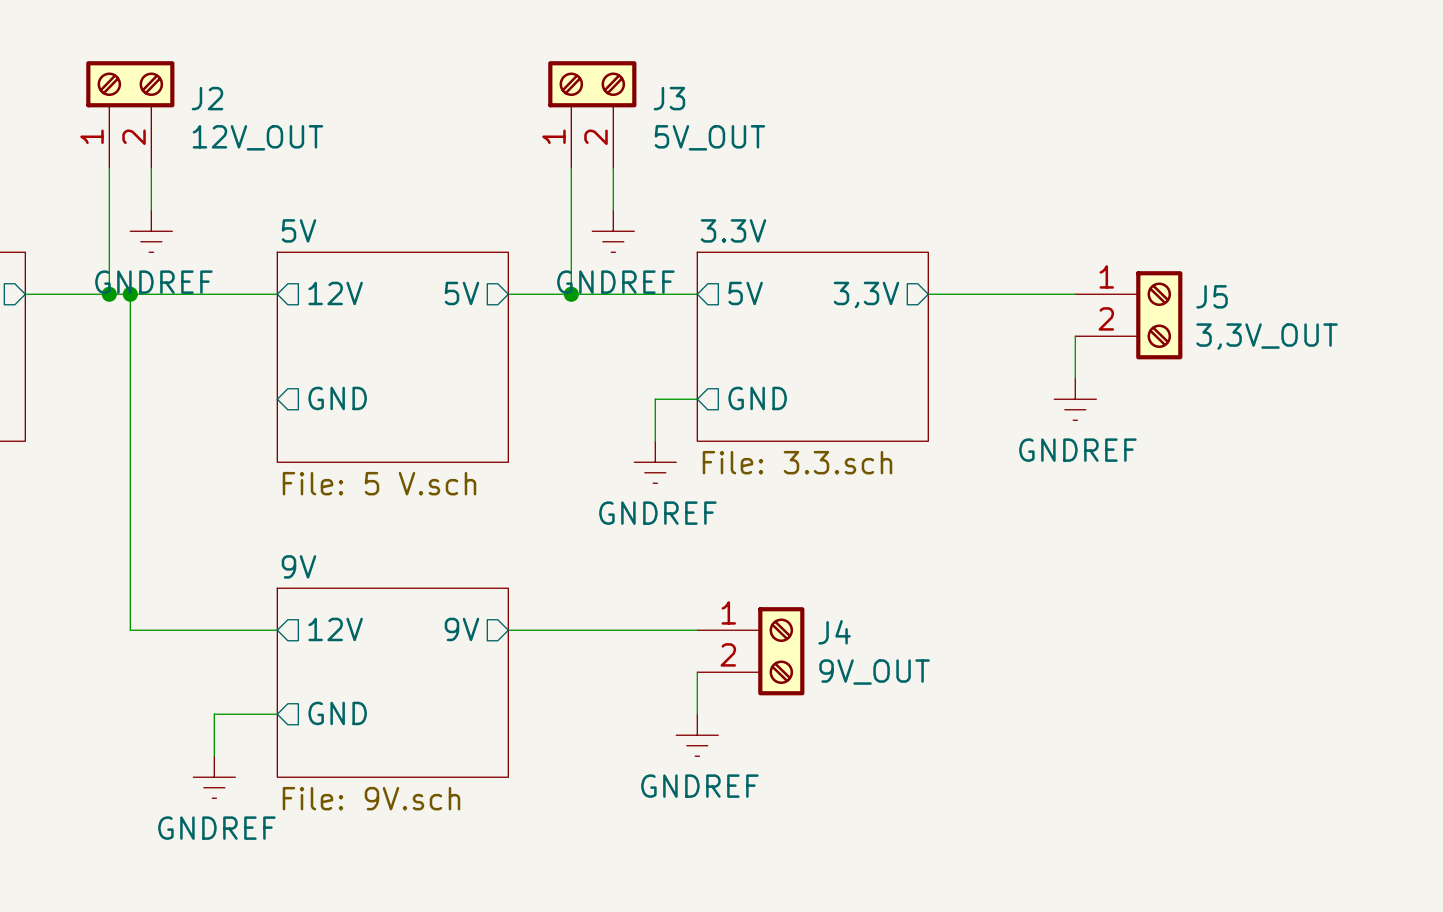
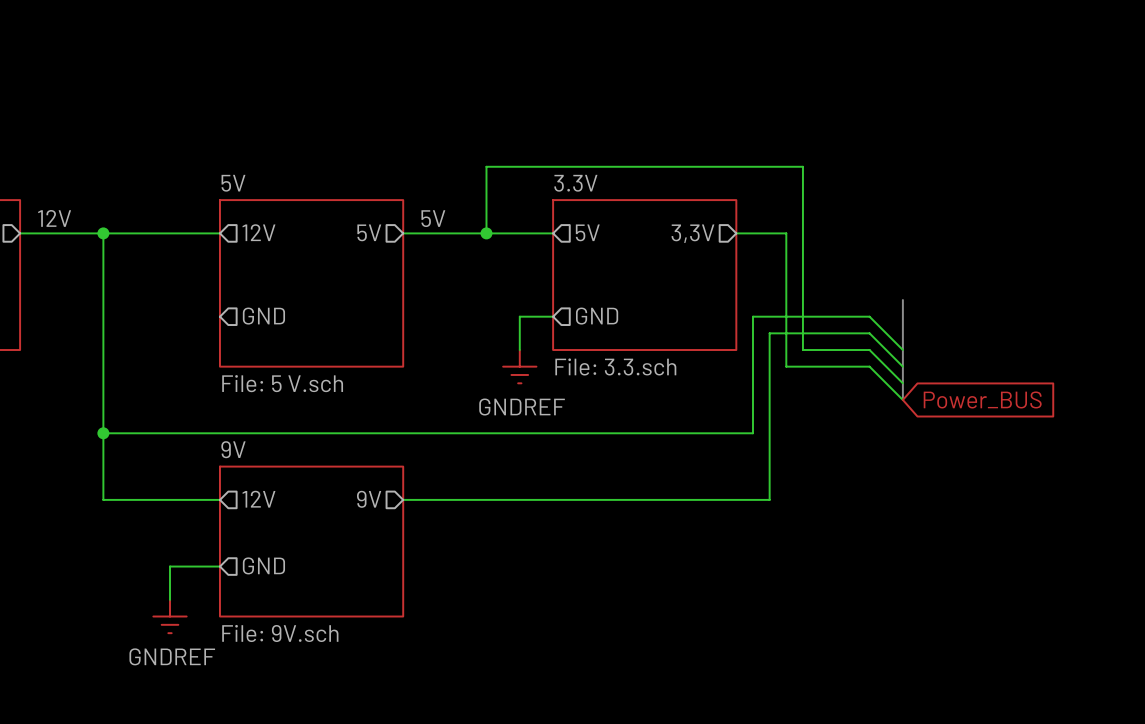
J2: 12V_OUT (130, 114) -> none
J3: 5V_OUT (592, 114) -> none
wire: (109, 168) (109, 294) -> none
wire: (151, 168) (151, 210) -> none
wire: (571, 168) (571, 294) -> none
wire: (613, 168) (613, 210) -> none
power symbol: GNDREF (151, 231) -> none
power symbol: GNDREF (613, 231) -> none
label: none -> 12V (54, 218)
label: none -> 5V (433, 218)
junction: (109, 294) -> none
junction position: (571, 294) -> (486, 233)
wire: none -> (486, 233) (486, 166) (802, 166) (802, 350) (869, 350) (902, 383)
wire: (991, 294) (1075, 294) -> (786, 233) (786, 366) (869, 366) (902, 399)
J5: 3,3V_OUT (1128, 315) -> none
wire: (1075, 336) (1075, 378) -> none
bus: none -> (902, 300) (902, 399)
power symbol: GNDREF (1075, 399) -> none
wire: none -> (902, 350) (869, 316) (752, 316) (752, 433) (103, 433)
wire: none -> (902, 366) (869, 333) (769, 333) (769, 499) (553, 499)
global label: none -> Power_BUS (982, 399)
junction: none -> (103, 433)
J4: 9V_OUT (750, 651) -> none
wire: (697, 672) (697, 714) -> none
power symbol: GNDREF (697, 735) -> none

